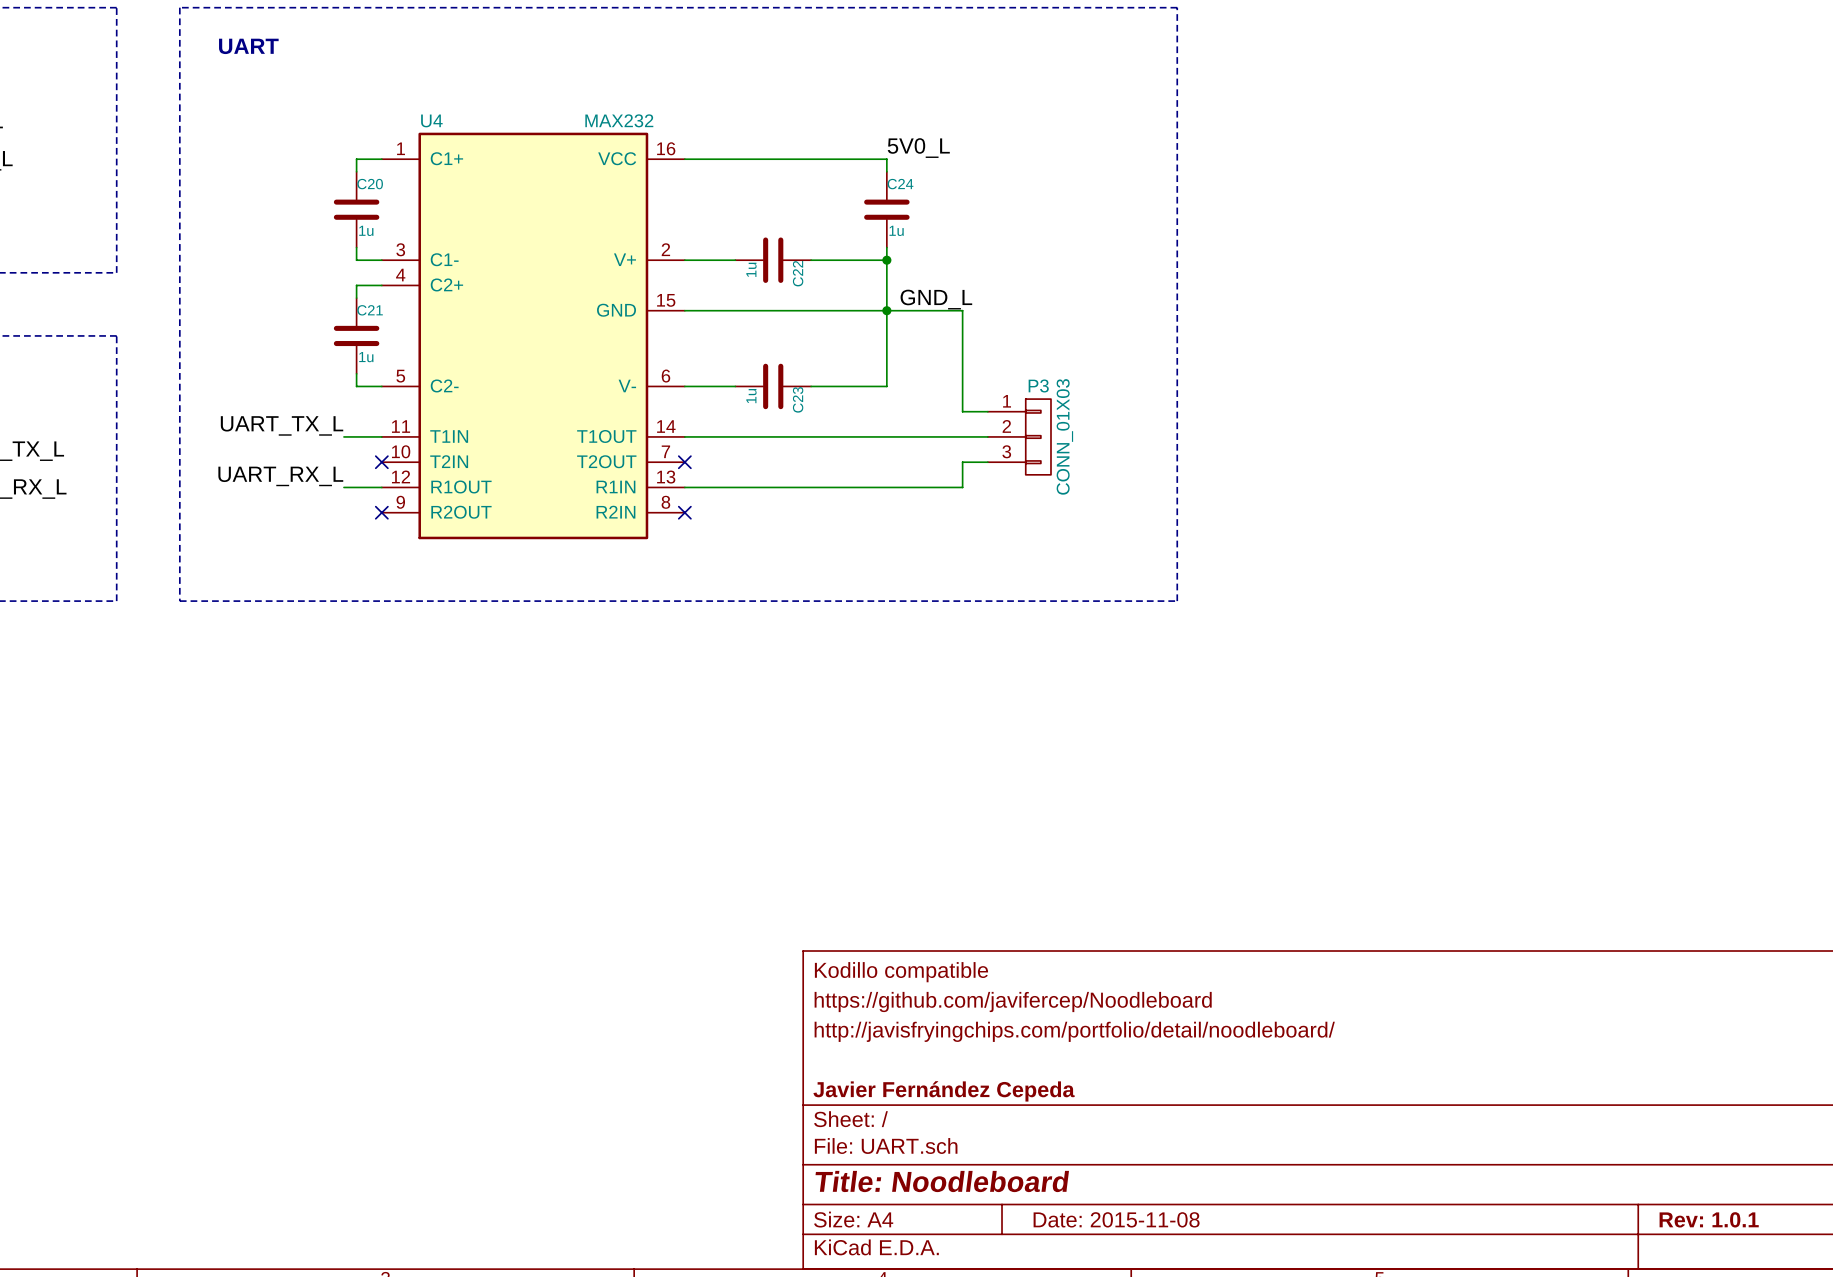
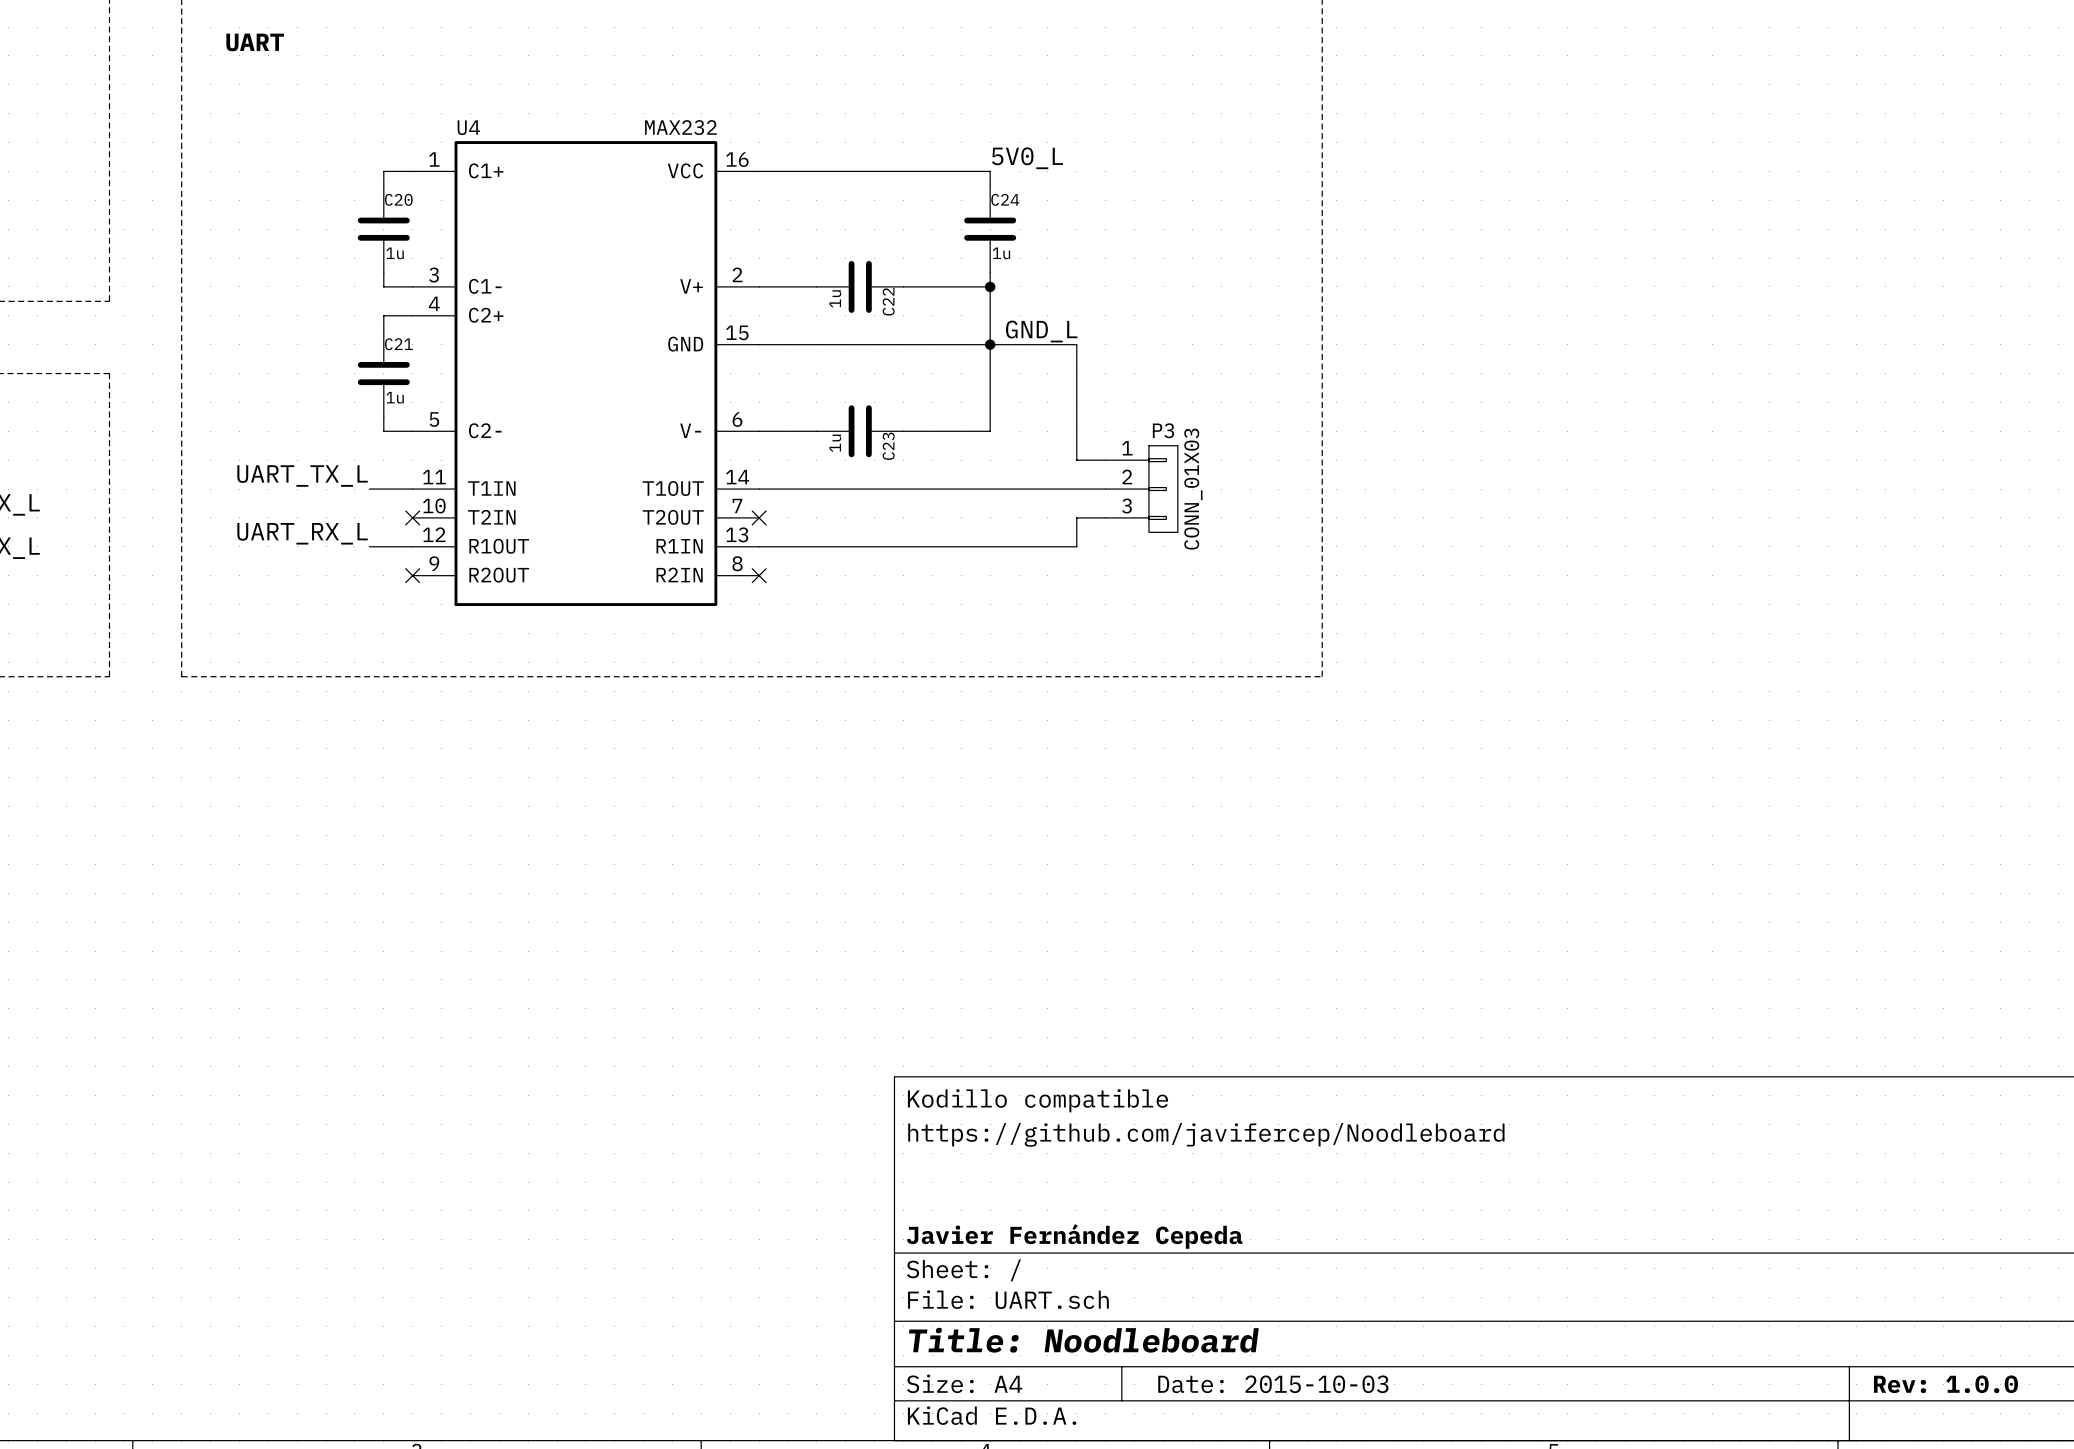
title block: http://javisfryingchips.com/portfolio/detail/noodleboard/ (1074, 1031) -> none
title block: Date: 2015-11-08 (1116, 1219) -> Date: 2015-10-03 (1273, 1384)
title block: Rev: 1.0.1 (1709, 1219) -> Rev: 1.0.0 (1946, 1384)

